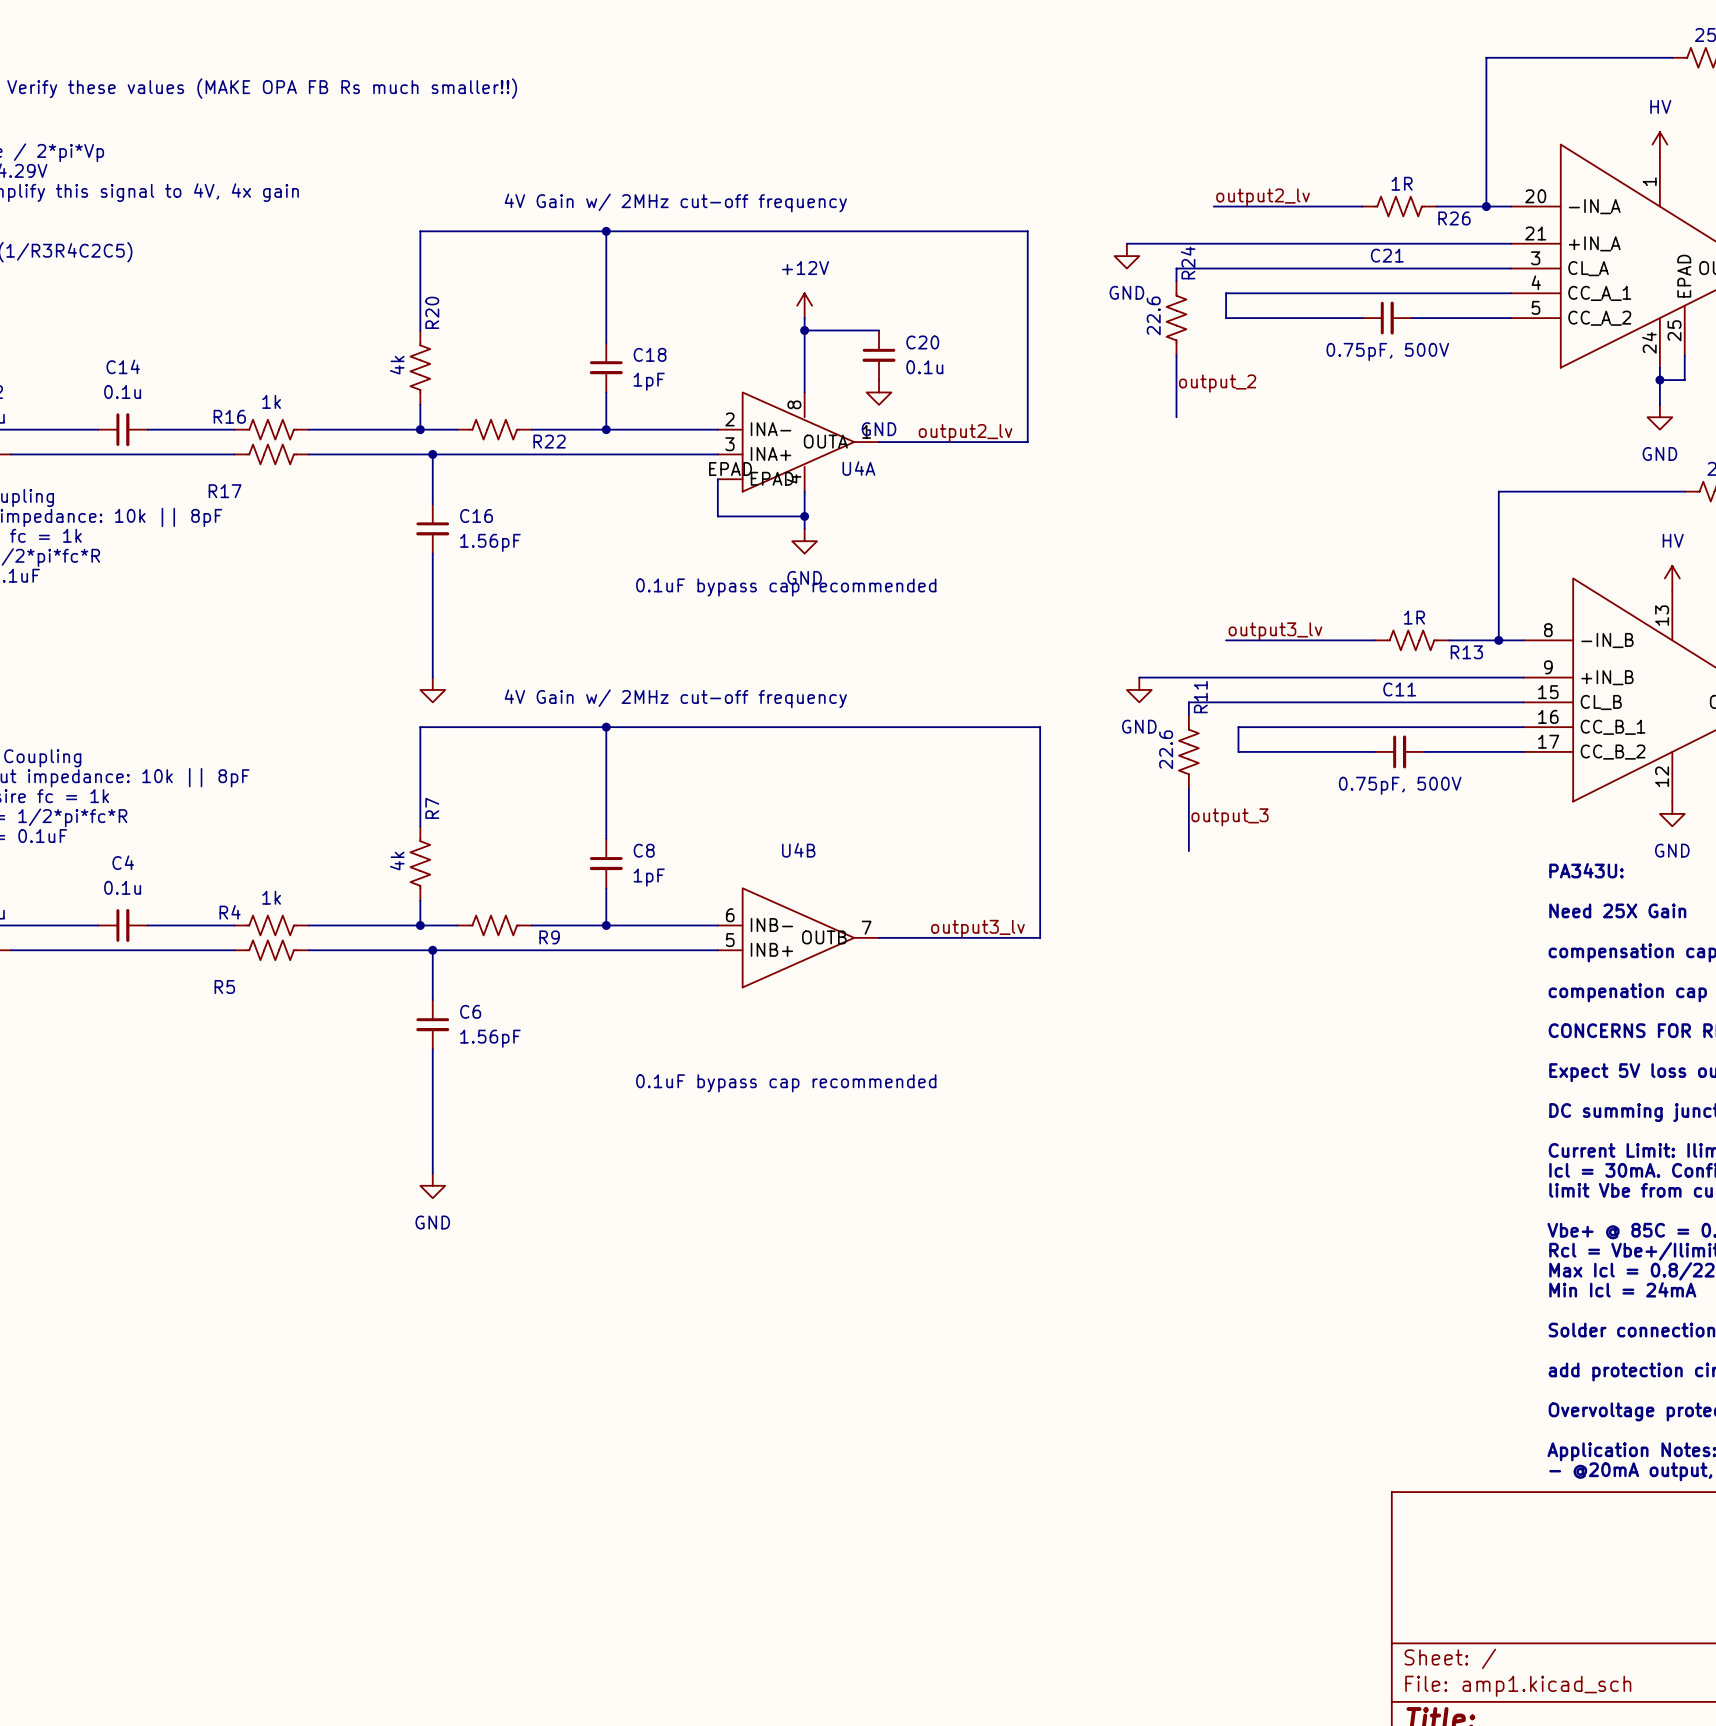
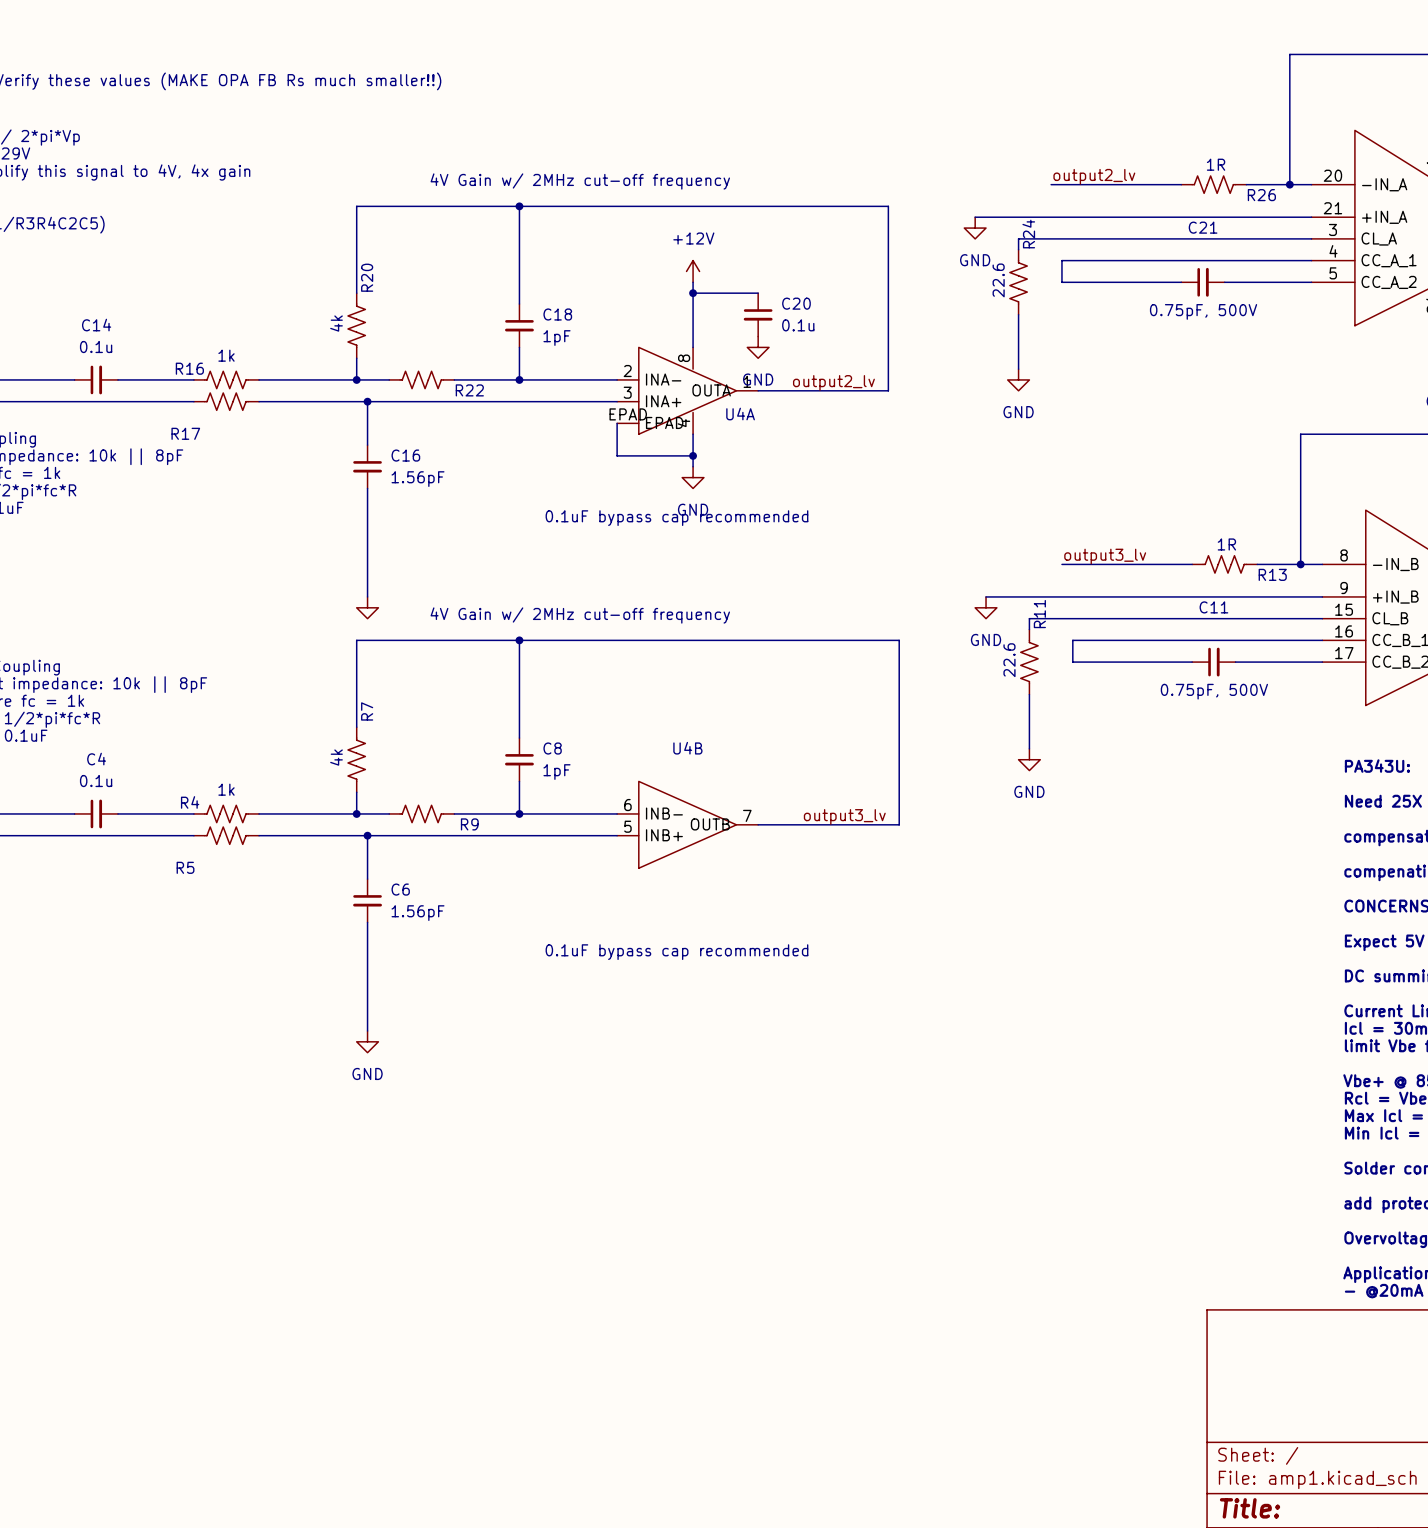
label: output_2 (1217, 383) -> none
power symbol: none -> GND (1018, 379)
label: output_3 (1230, 817) -> none
power symbol: none -> GND (1029, 759)

